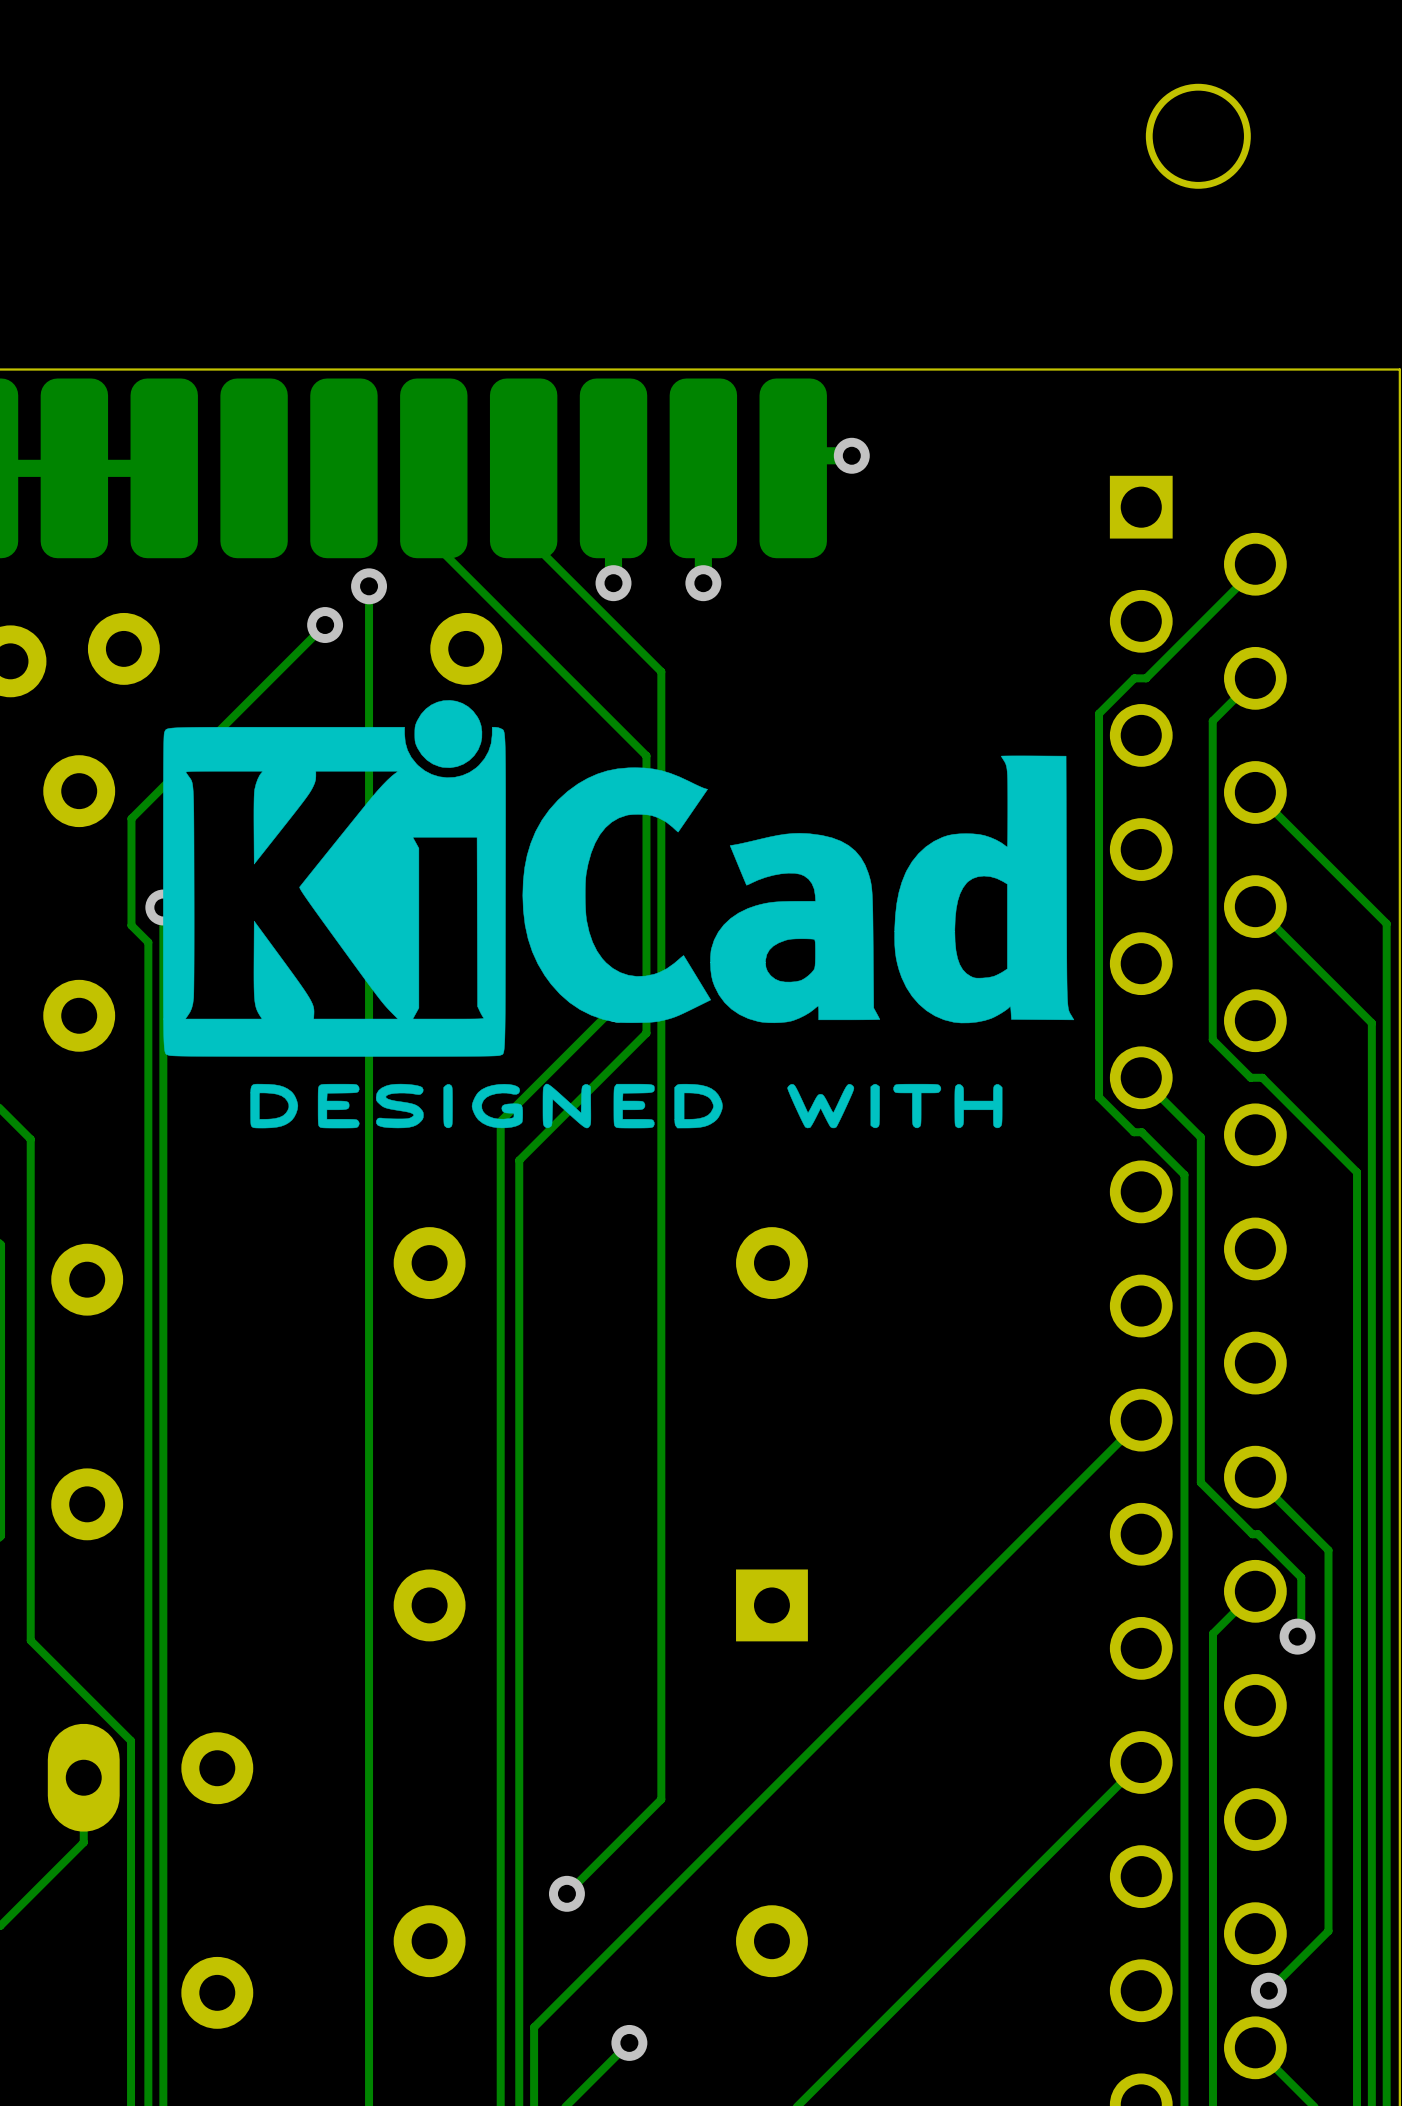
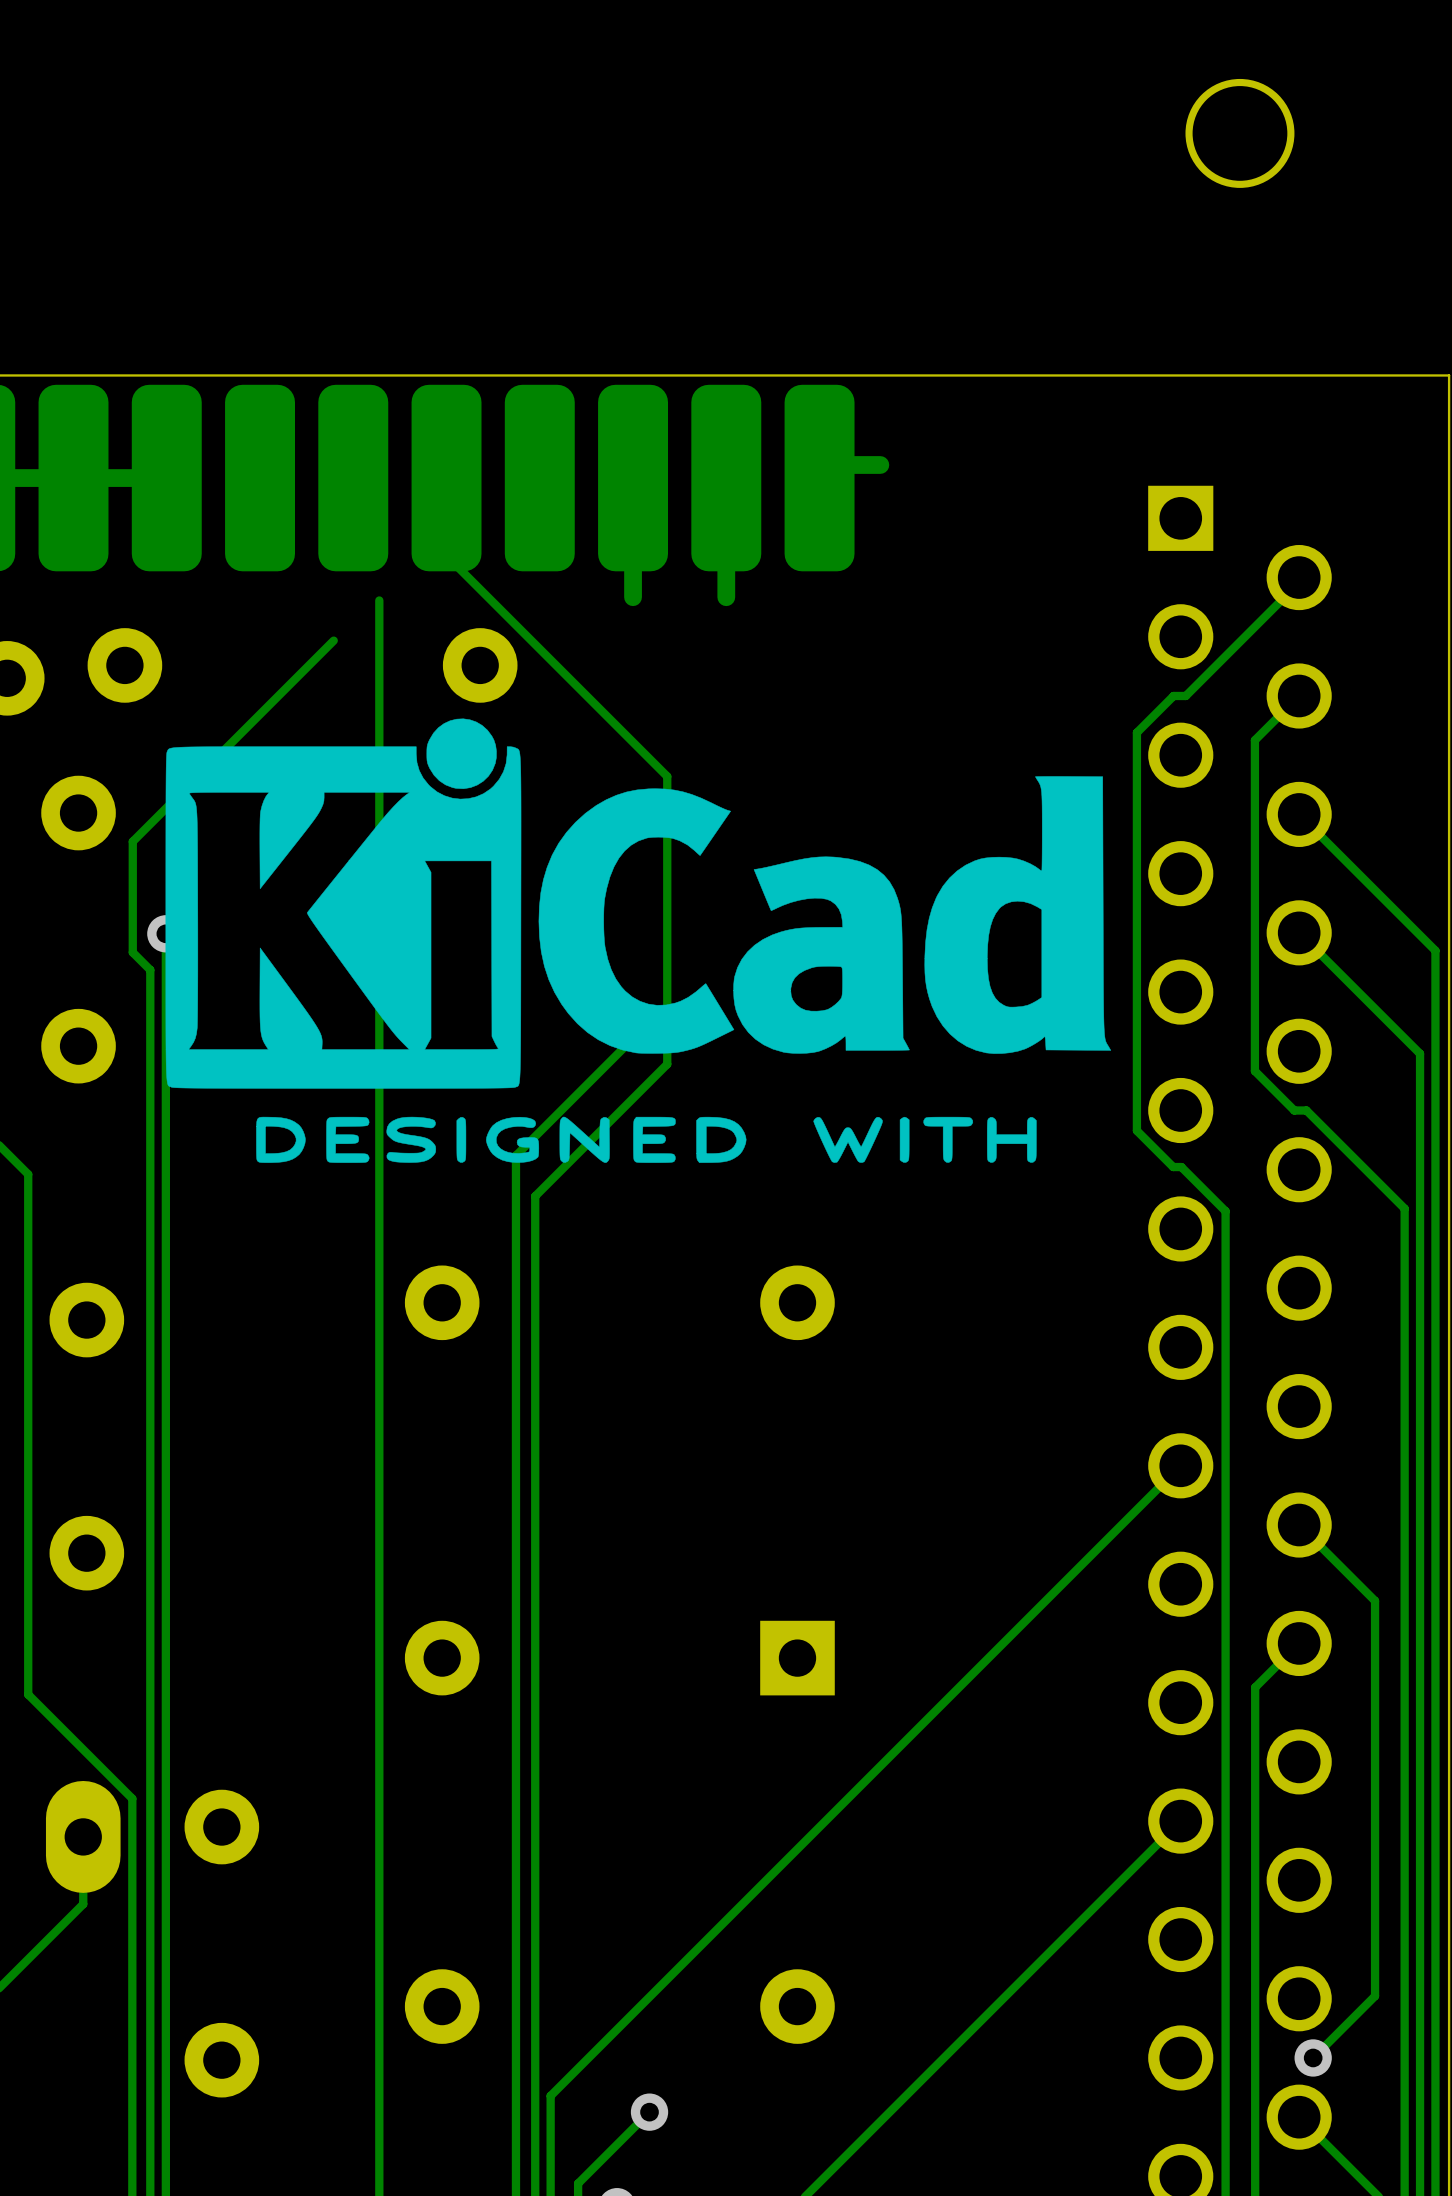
via: (851, 455) -> none
track: (523, 468) (523, 534) (661, 671) (661, 1799) (566, 1893) -> none
via: (613, 583) -> none
via: (703, 583) -> none
via: (369, 586) -> none
via: (325, 625) -> none
track: (1141, 1077) (1200, 1137) (1200, 1482) (1252, 1534) (1258, 1534) (1301, 1577) (1301, 1632) (1297, 1636) -> none
via: (1297, 1636) -> none
via: (566, 1893) -> none

